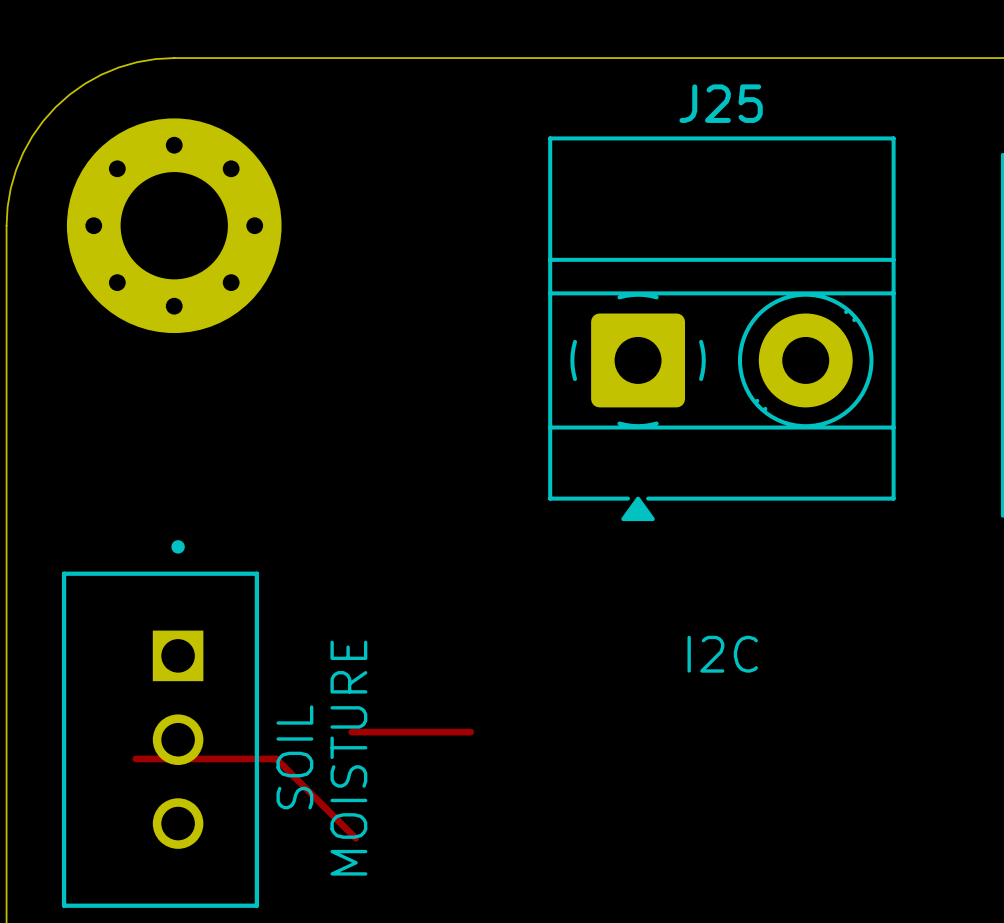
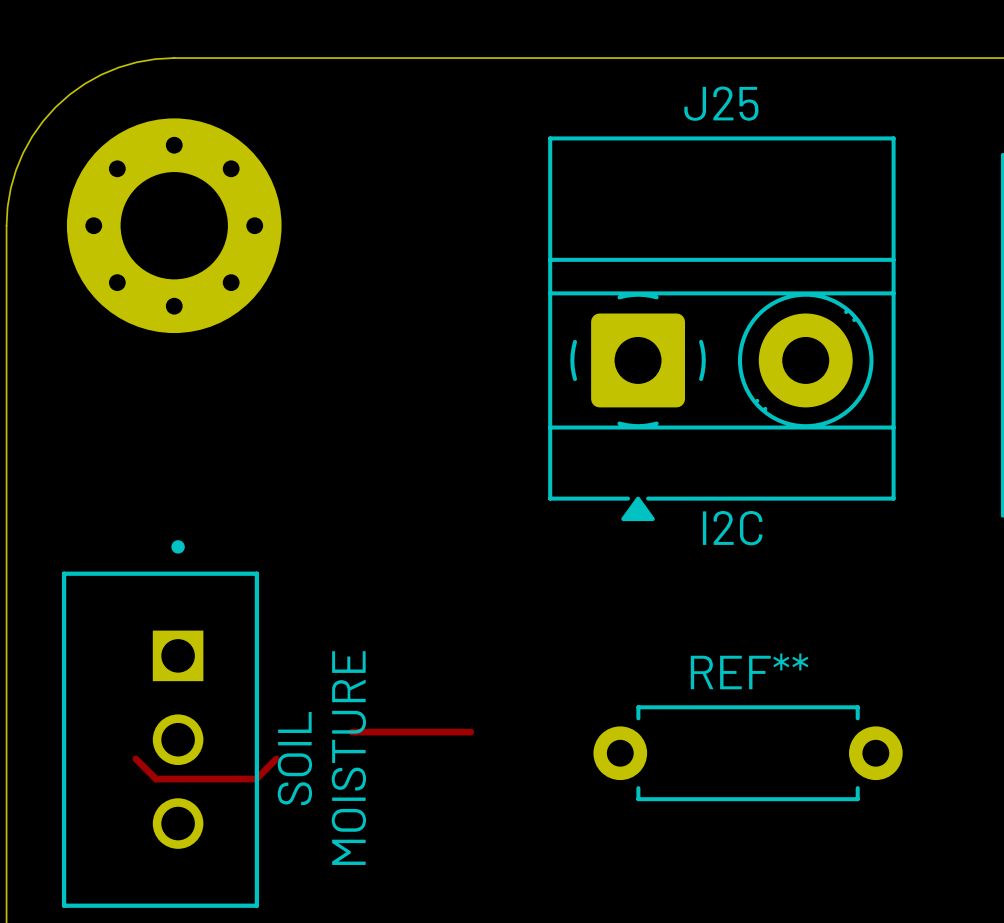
text position: I2C (722, 654) -> I2C (732, 528)
REF**: none -> (748, 753)
top track: (135, 758) (276, 758) (355, 838) -> (135, 758) (155, 779) (256, 779) (276, 758)

